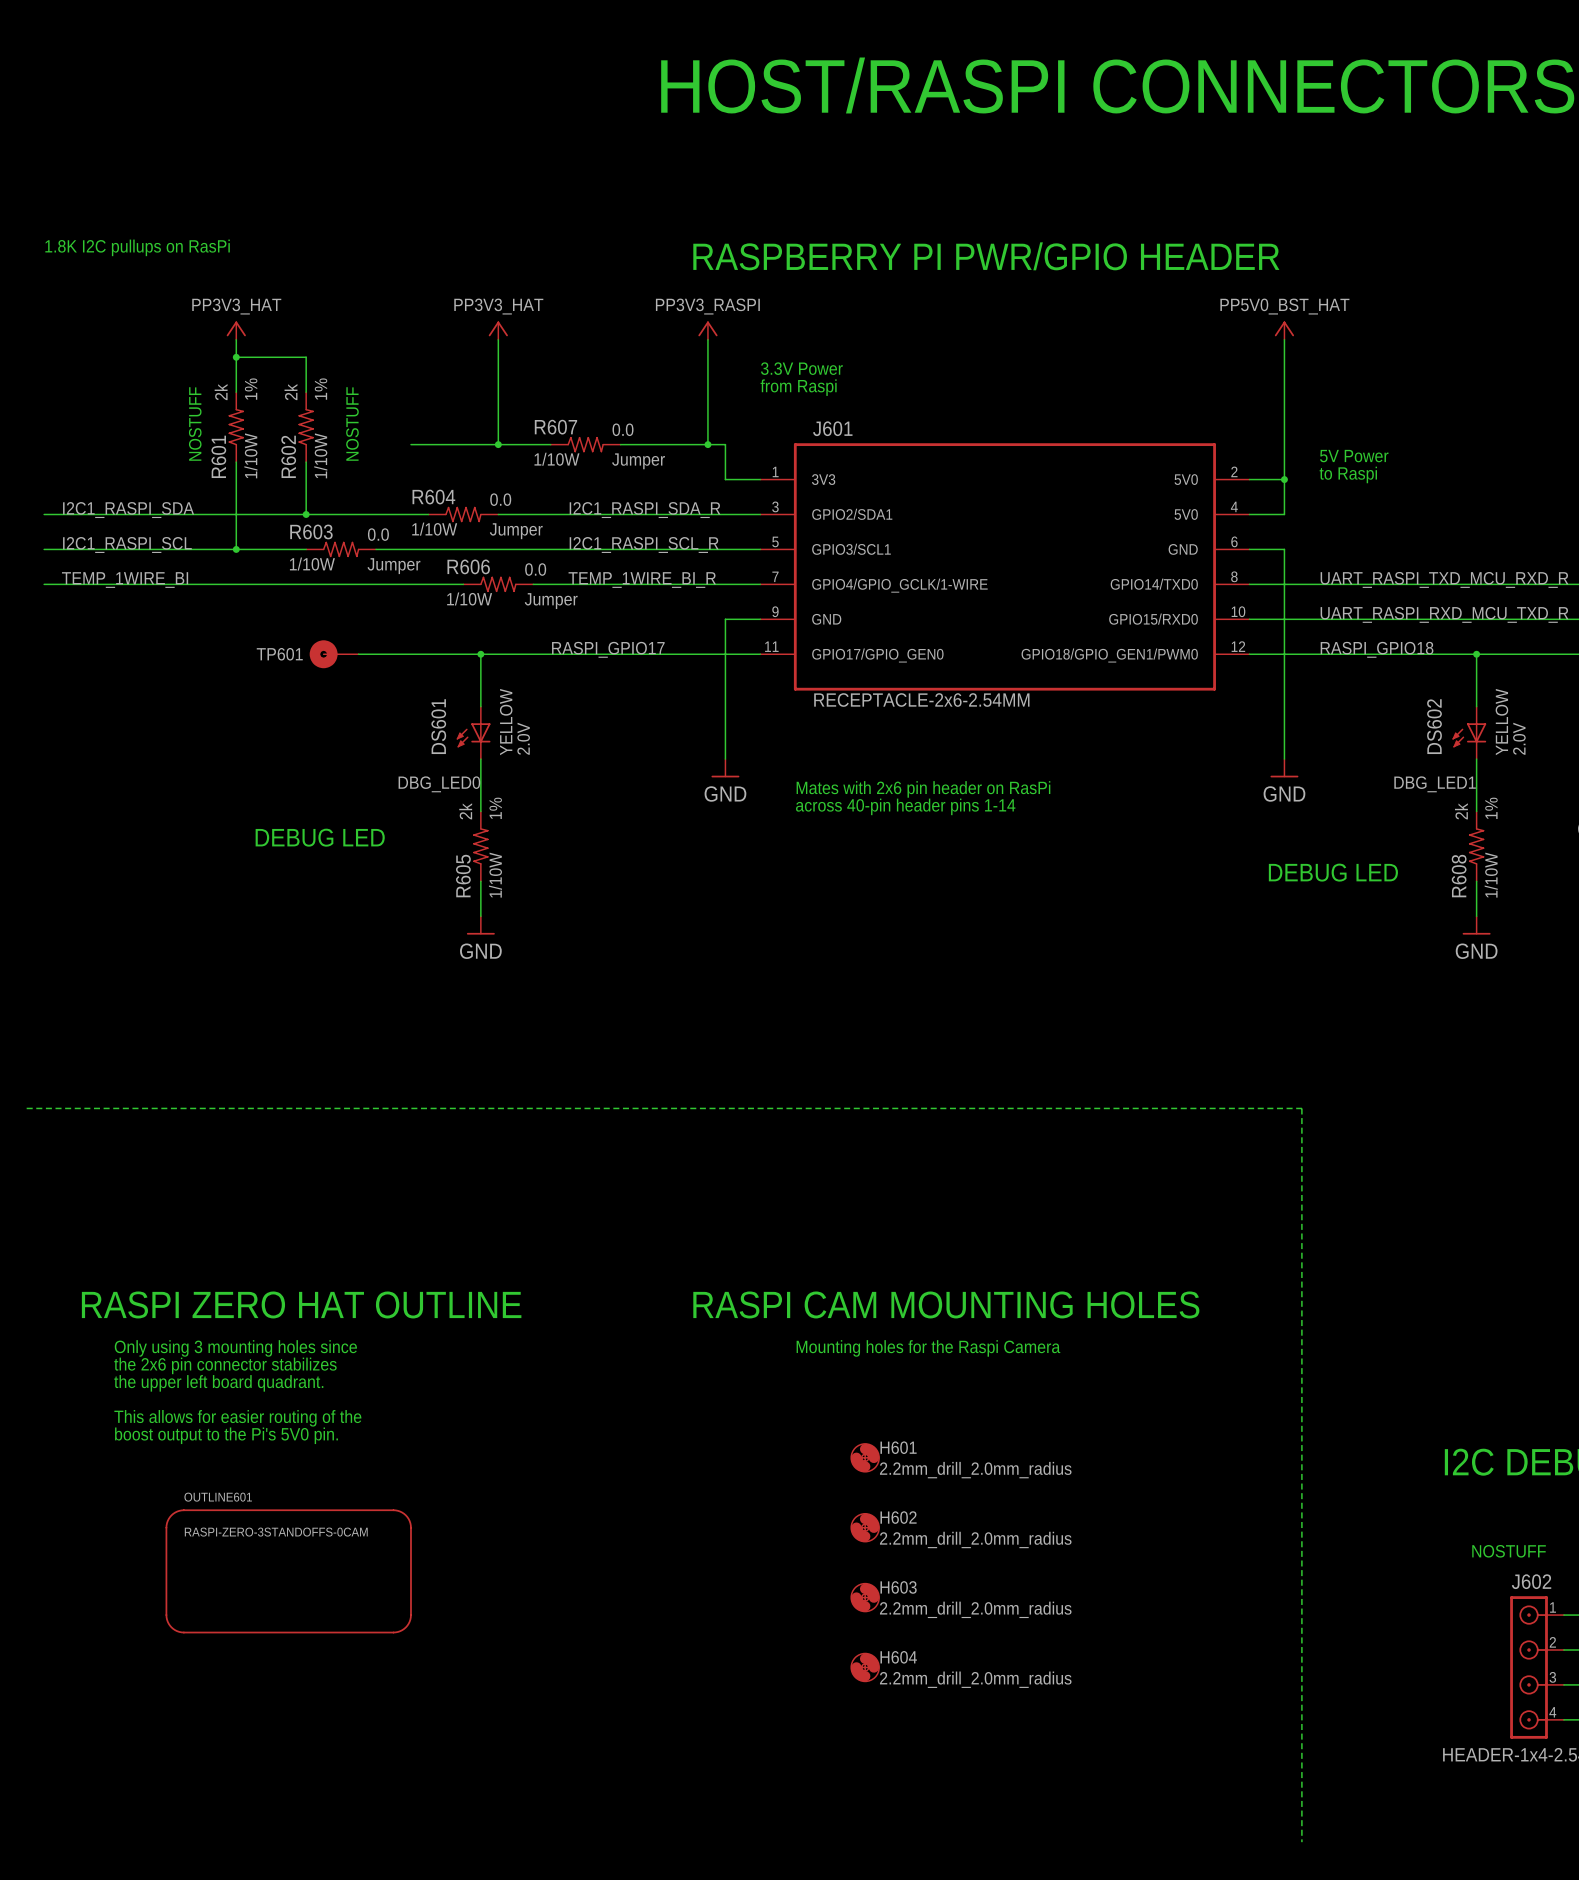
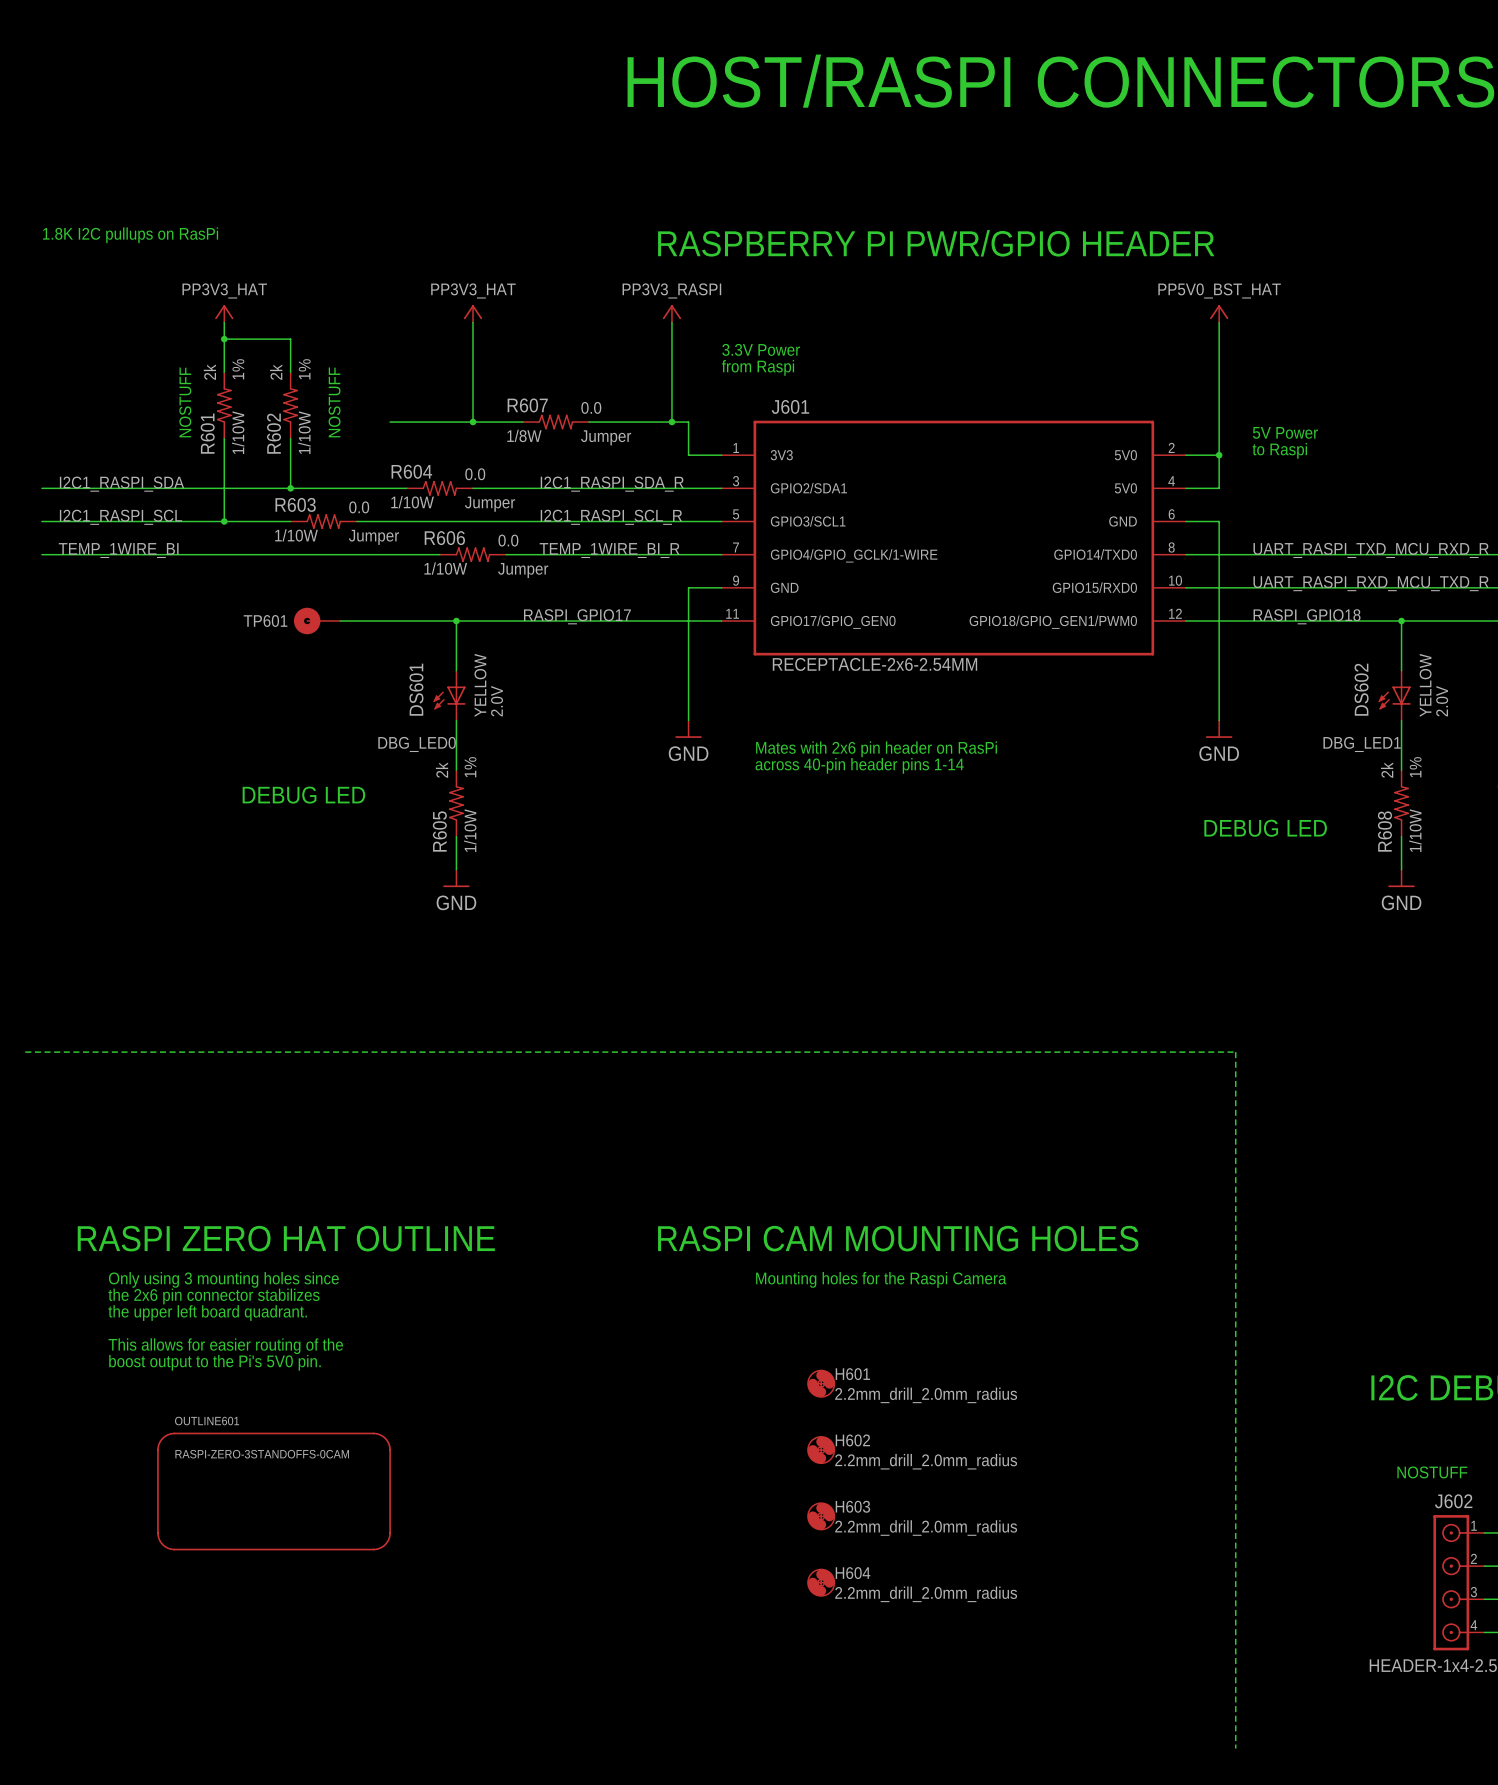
R607 text: 1/10W (556, 459) -> 1/8W (524, 435)

